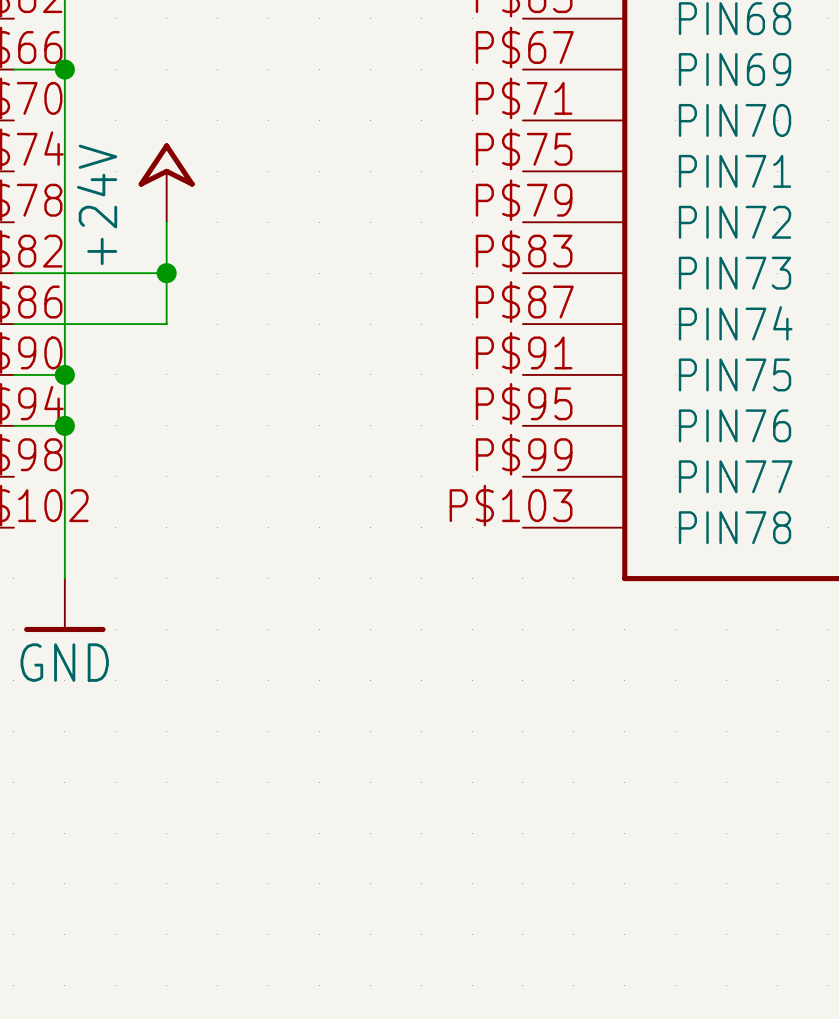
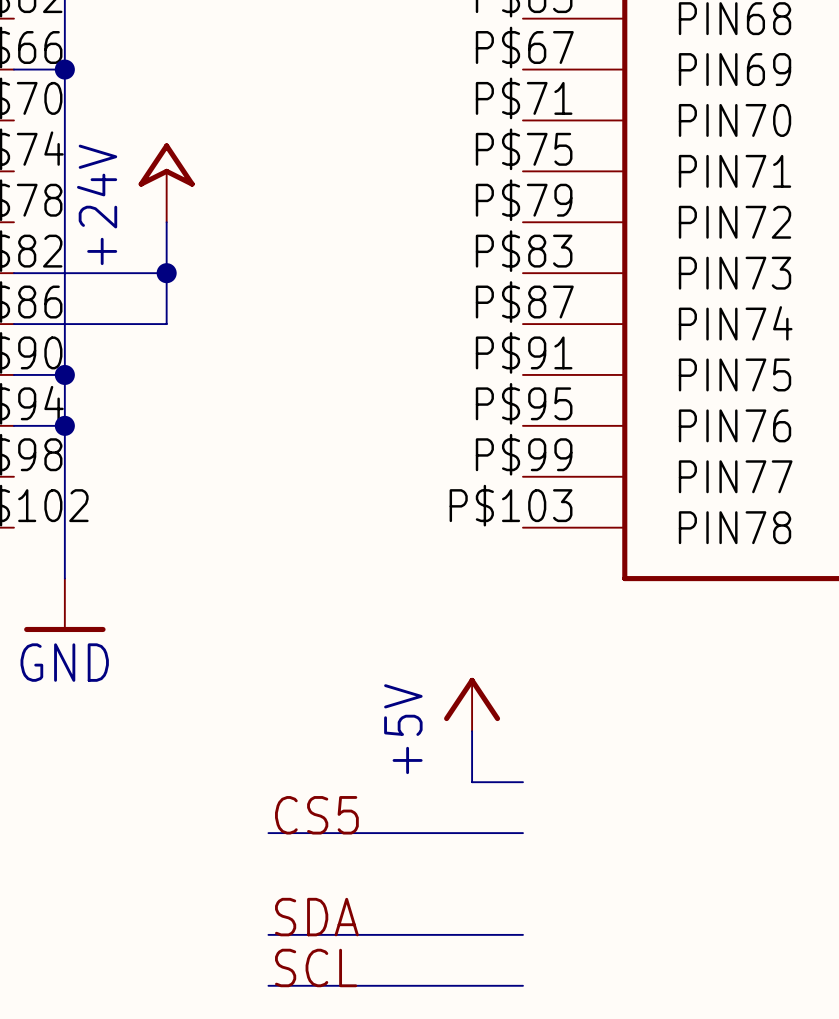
power symbol: none -> +5V (472, 704)
wire: none -> (472, 731) (472, 782) (522, 782)
label: none -> CS5 (316, 815)
wire: none -> (268, 833) (522, 833)
label: none -> SDA (316, 917)
wire: none -> (268, 934) (522, 934)
label: none -> SCL (316, 967)
wire: none -> (268, 985) (522, 985)

